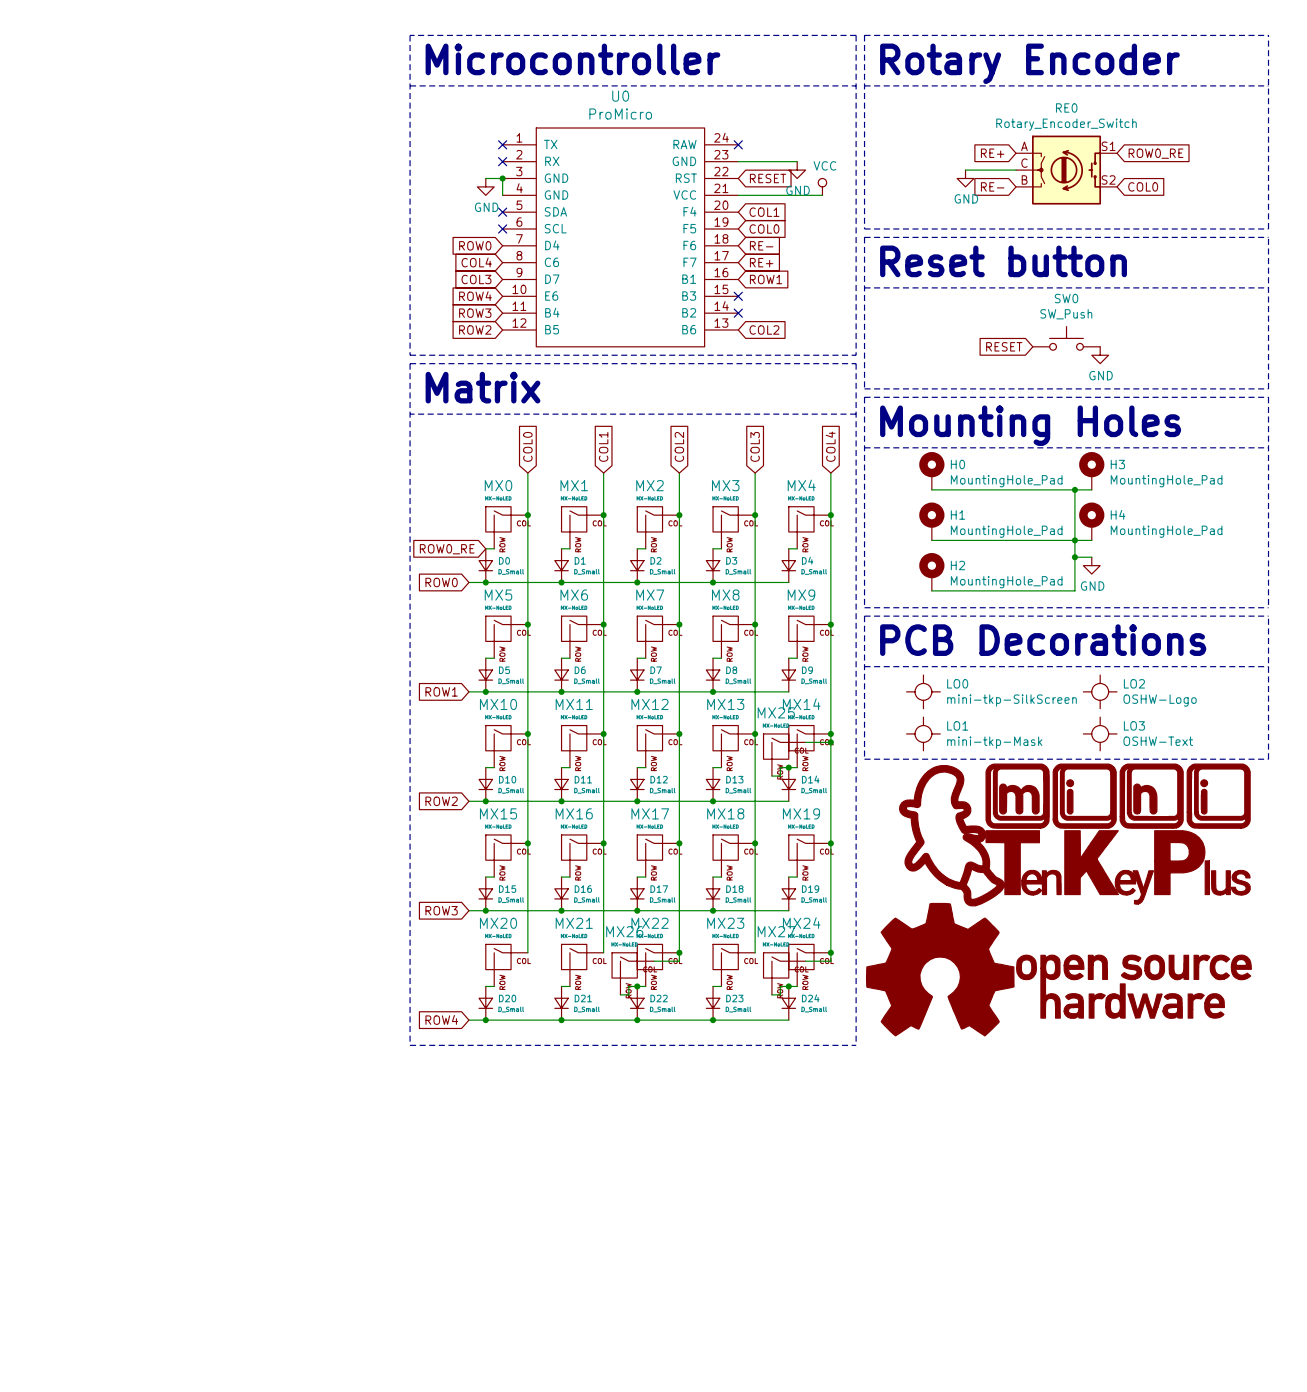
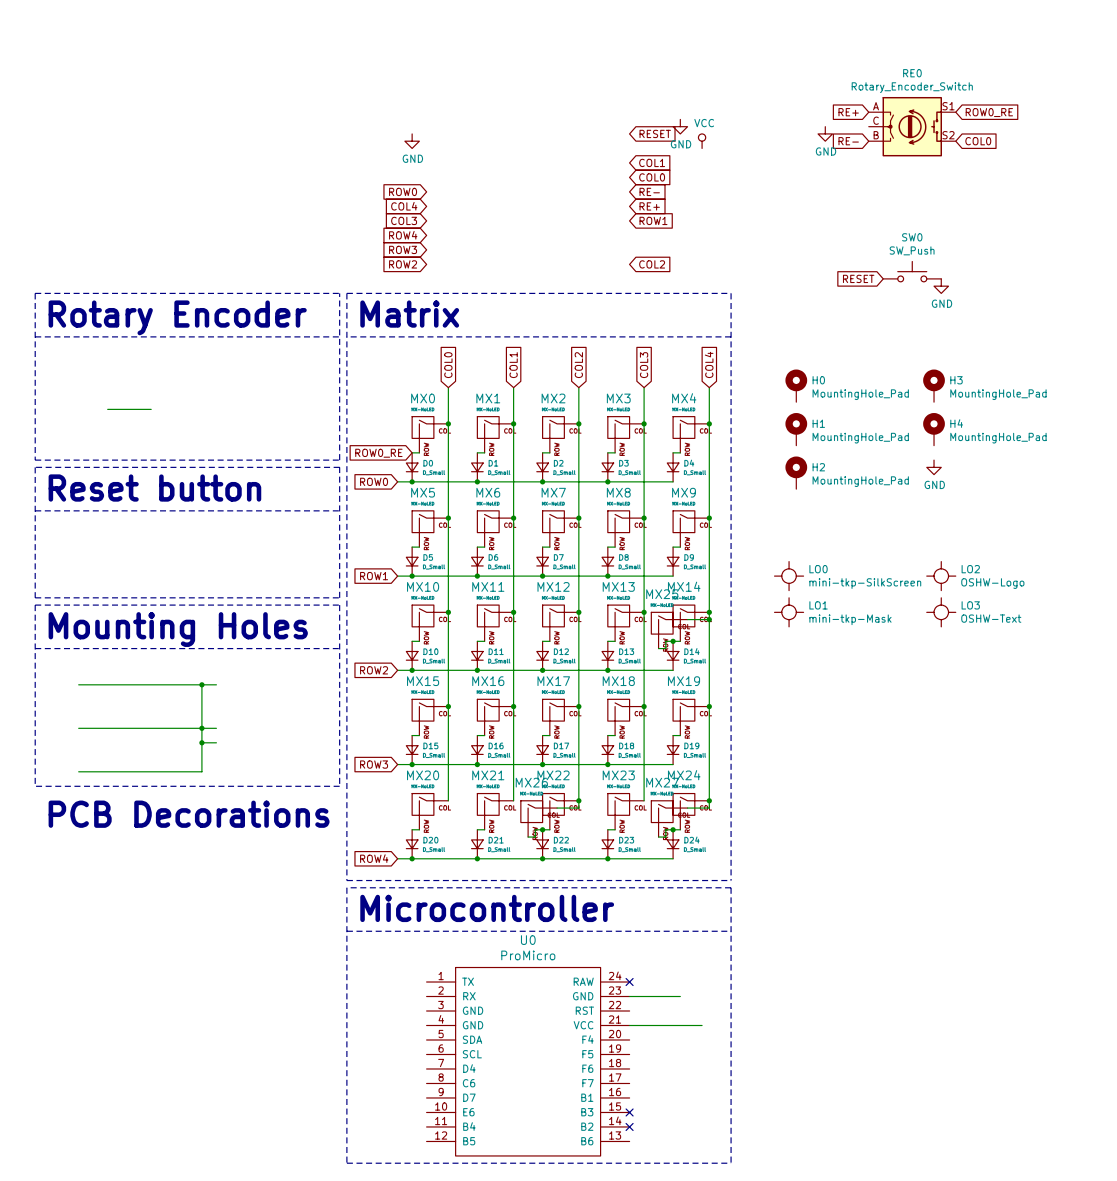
line: (410, 35) (410, 355) (856, 355) (856, 35) (410, 35) -> none
line: (864, 35) (1268, 35) (1268, 228) (864, 228) (864, 35) -> none
text: Microcontroller (572, 59) -> none
text: Rotary Encoder (1029, 63) -> none
line: (410, 85) (856, 85) -> none
line: (864, 85) (1268, 85) -> none
no-connect mark: (502, 144) -> none
no-connect mark: (738, 144) -> none
no-connect mark: (502, 161) -> none
wire: (738, 161) (797, 161) -> none
wire: (965, 170) (1016, 170) -> none
wire: (485, 178) (502, 178) (502, 195) -> none
junction: (502, 178) -> none
wire: (738, 195) (822, 195) -> none
no-connect mark: (502, 212) -> none
no-connect mark: (502, 228) -> none
U0 position: (620, 237) -> (528, 1061)
line: (864, 237) (864, 388) (1268, 388) (1268, 237) (864, 237) -> none
text: Reset button (1003, 261) -> none
line: (864, 287) (1268, 287) -> none
no-connect mark: (738, 296) -> none
no-connect mark: (738, 313) -> none
line: none -> (35, 293) (339, 293) (339, 460) (35, 460) (35, 293)
text: none -> Rotary Encoder (177, 317)
line: (864, 397) (864, 607) (1268, 607) (1268, 397) (864, 397) -> none
line: none -> (35, 336) (339, 336)
text: Mounting Holes (1030, 425) -> none
line: (864, 447) (1268, 447) -> none
wire: (931, 489) (1091, 489) -> none
wire: (1074, 489) (1074, 590) (931, 590) -> none
junction: (1074, 489) -> none
wire: none -> (107, 409) (151, 409)
wire: (931, 540) (1091, 540) -> none
junction: (1074, 540) -> none
wire: (1074, 557) (1091, 557) -> none
junction: (1074, 557) -> none
line: none -> (35, 467) (339, 467) (339, 597) (35, 597) (35, 467)
text: none -> Reset button (154, 488)
line: none -> (35, 510) (339, 510)
line: (864, 616) (864, 759) (1268, 759) (1268, 616) (864, 616) -> none
text: PCB Decorations (1043, 640) -> none
line: (864, 666) (1268, 666) -> none
line: none -> (35, 605) (35, 786) (339, 786) (339, 605) (35, 605)
text: none -> Mounting Holes (178, 629)
drawing: [899, 764, 1251, 906] -> none
line: none -> (35, 648) (339, 648)
wire: none -> (78, 684) (216, 684)
wire: none -> (201, 684) (201, 771) (78, 771)
junction: none -> (201, 684)
wire: none -> (78, 728) (216, 728)
junction: none -> (201, 728)
wire: none -> (201, 742) (216, 742)
junction: none -> (201, 742)
drawing: [1016, 955, 1252, 1019] -> none
text: none -> PCB Decorations (189, 814)
power symbol: (940, 969) -> none
line: none -> (346, 887) (346, 1163) (731, 1163) (731, 887) (346, 887)
text: none -> Microcontroller (487, 908)
line: none -> (346, 931) (731, 931)
no-connect mark: none -> (629, 982)
wire: none -> (629, 996) (680, 996)
wire: none -> (629, 1025) (702, 1025)
no-connect mark: none -> (629, 1112)
no-connect mark: none -> (629, 1126)

